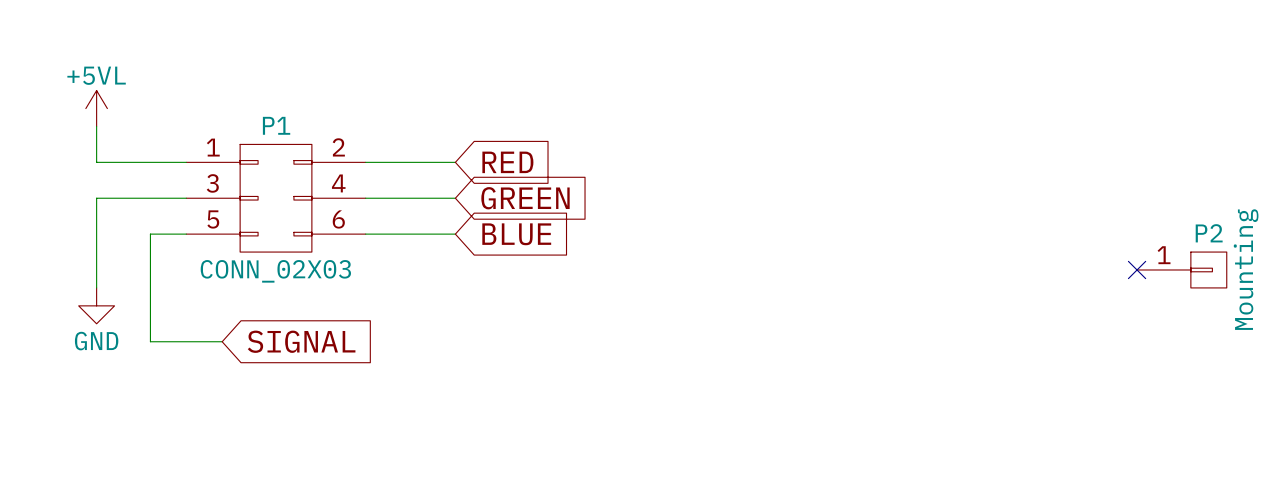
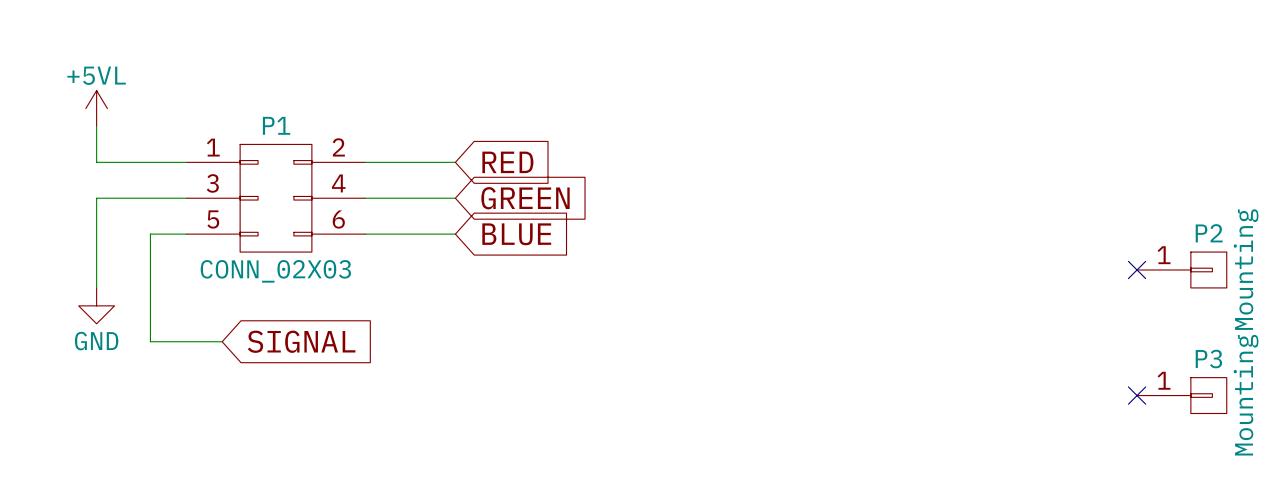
no-connect mark: none -> (1137, 395)
P3: none -> Mounting (1181, 395)

